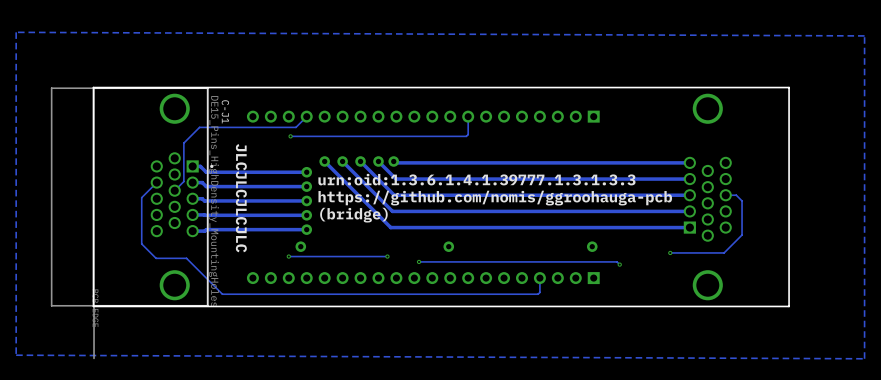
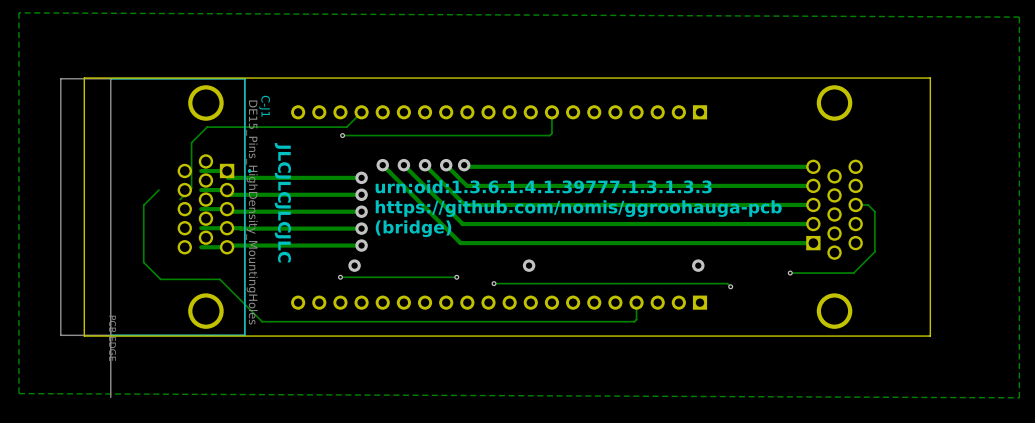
board edge: (789, 87) (93, 87) (93, 306) (789, 306) -> (930, 78) (84, 78) (84, 336) (930, 336)
track: (295, 127) (199, 127) (183, 143) (183, 181) (174, 190) -> (348, 124) (346, 127) (207, 127) (191, 142) (191, 188) (180, 199)
track: (192, 166) (200, 166) (206, 172) -> (201, 170) (221, 170) (228, 177) (243, 177)
track: (156, 182) (141, 197) (141, 243) (156, 258) -> (158, 190) (143, 205) (143, 262) (160, 279) (183, 279)
track: (192, 182) (202, 182) (206, 186) -> (201, 190) (223, 190) (228, 194) (243, 194)
track: (192, 198) (202, 198) (204, 200) -> (201, 209) (225, 209) (228, 211) (241, 211)
track: none -> (227, 228) (201, 228)
track: (206, 229) (192, 231) -> (243, 245) (201, 247)

